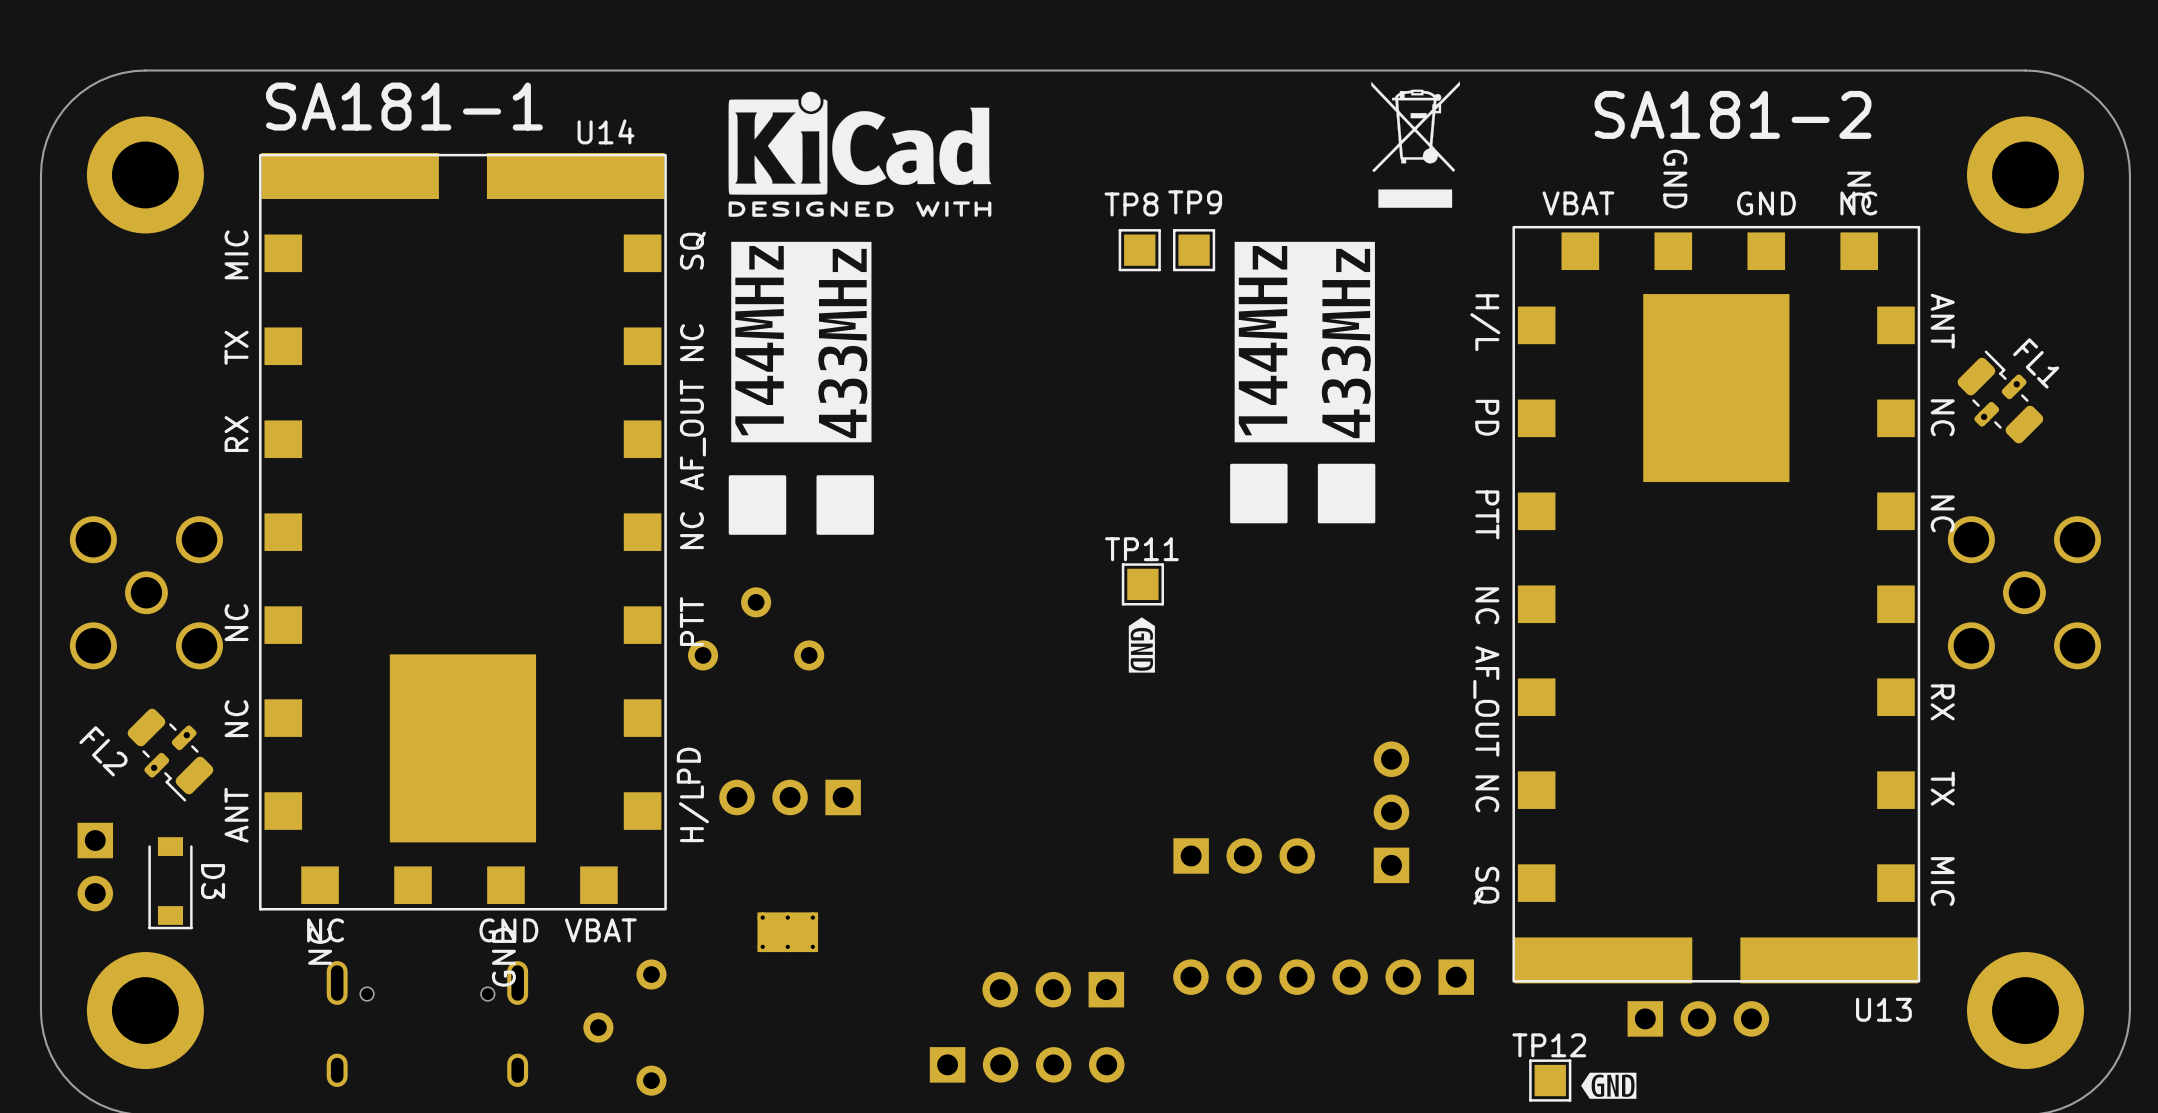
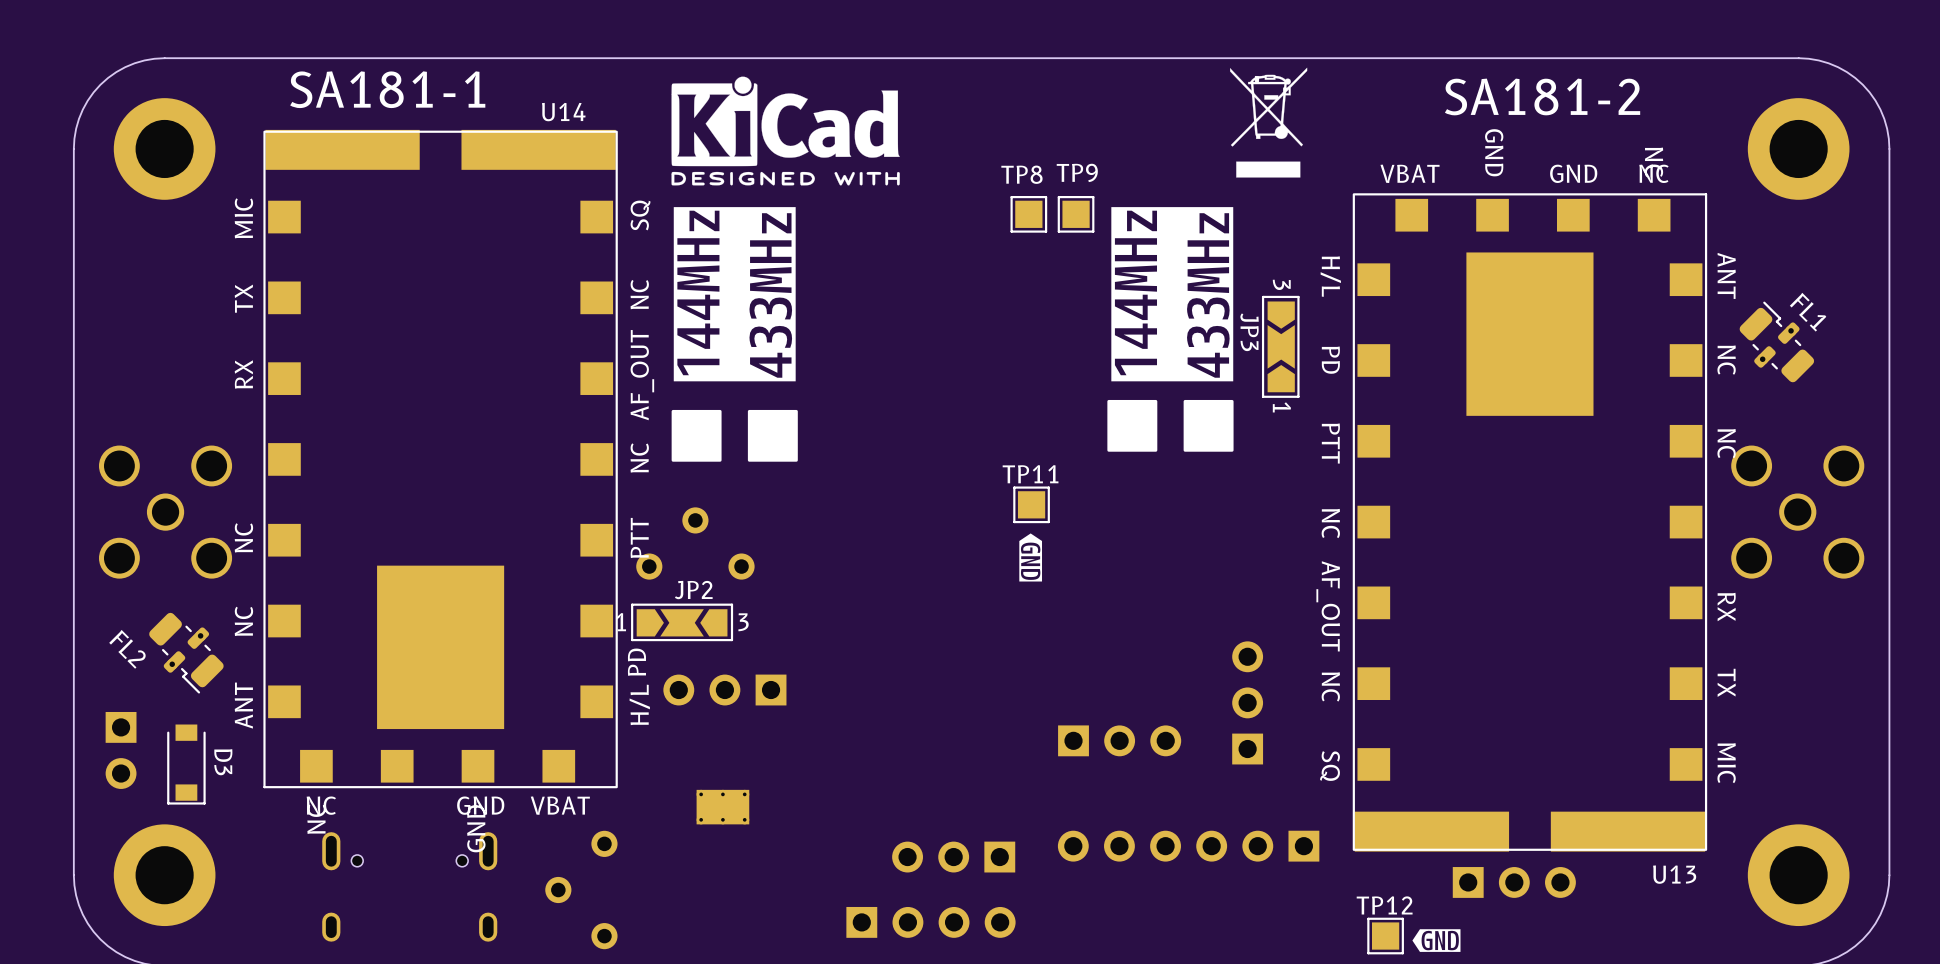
JP3: none -> (1280, 346)
JP2: none -> (682, 622)

